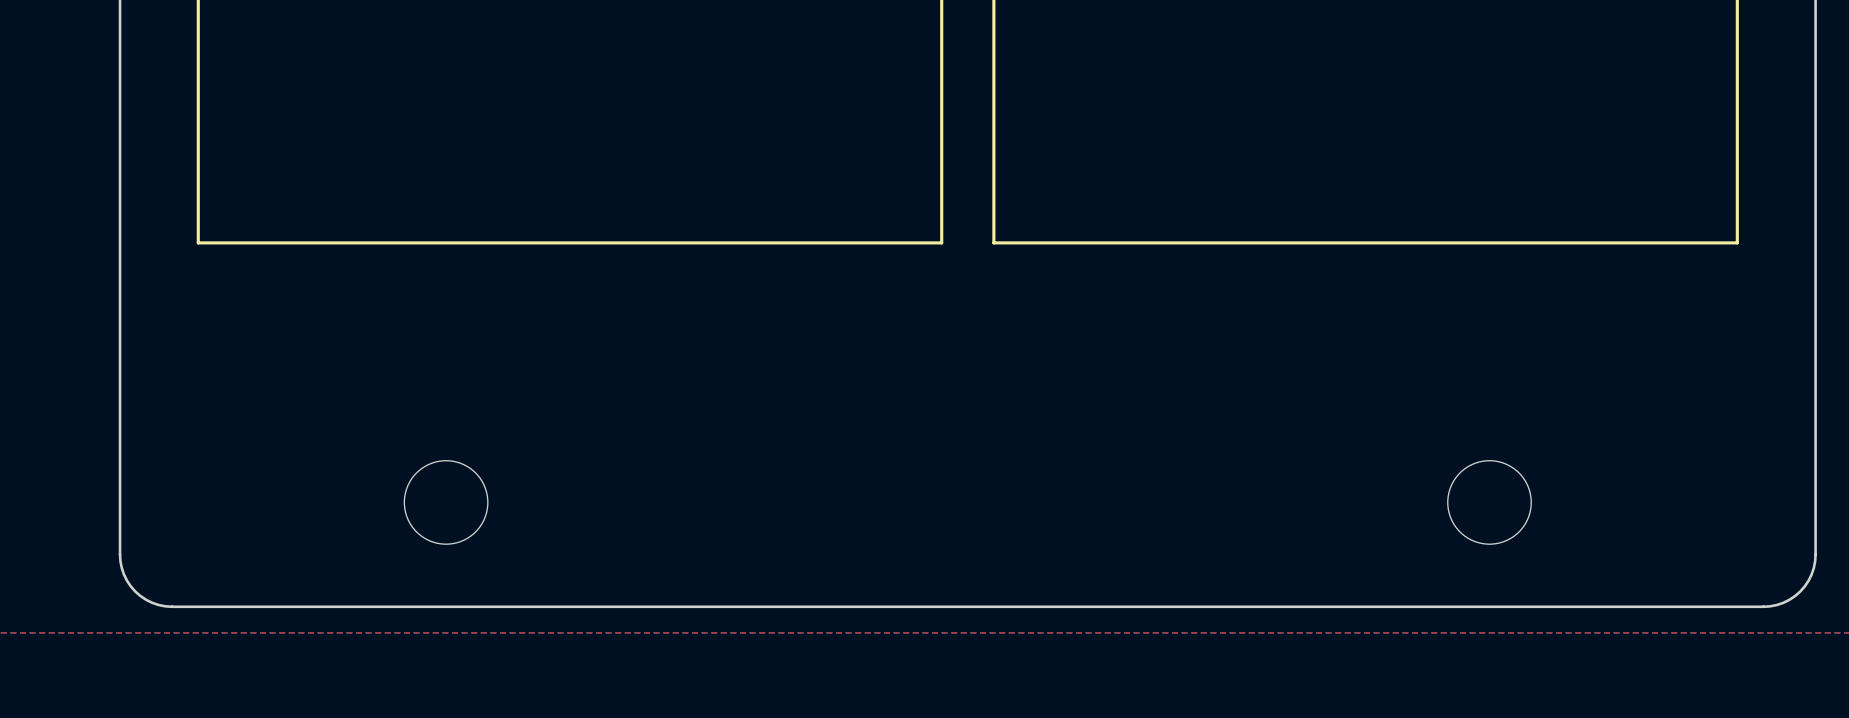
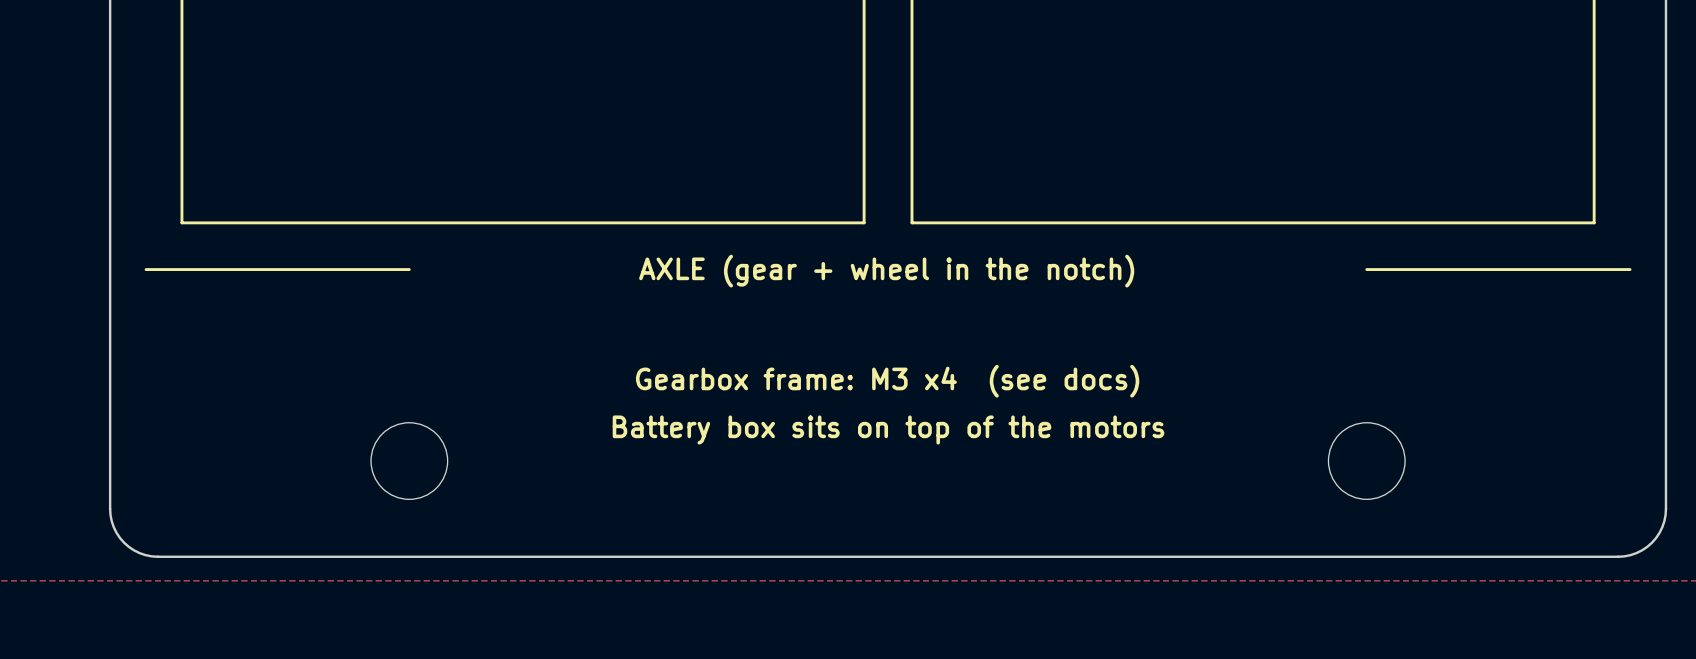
line: none -> (146, 269) (409, 269)
line: none -> (1366, 269) (1630, 269)
text: none -> AXLE (gear + wheel in the notch) (886, 271)
text: none -> Gearbox frame: M3 x4 (see docs) (887, 381)
text: none -> Battery box sits on top of the motors (888, 430)

